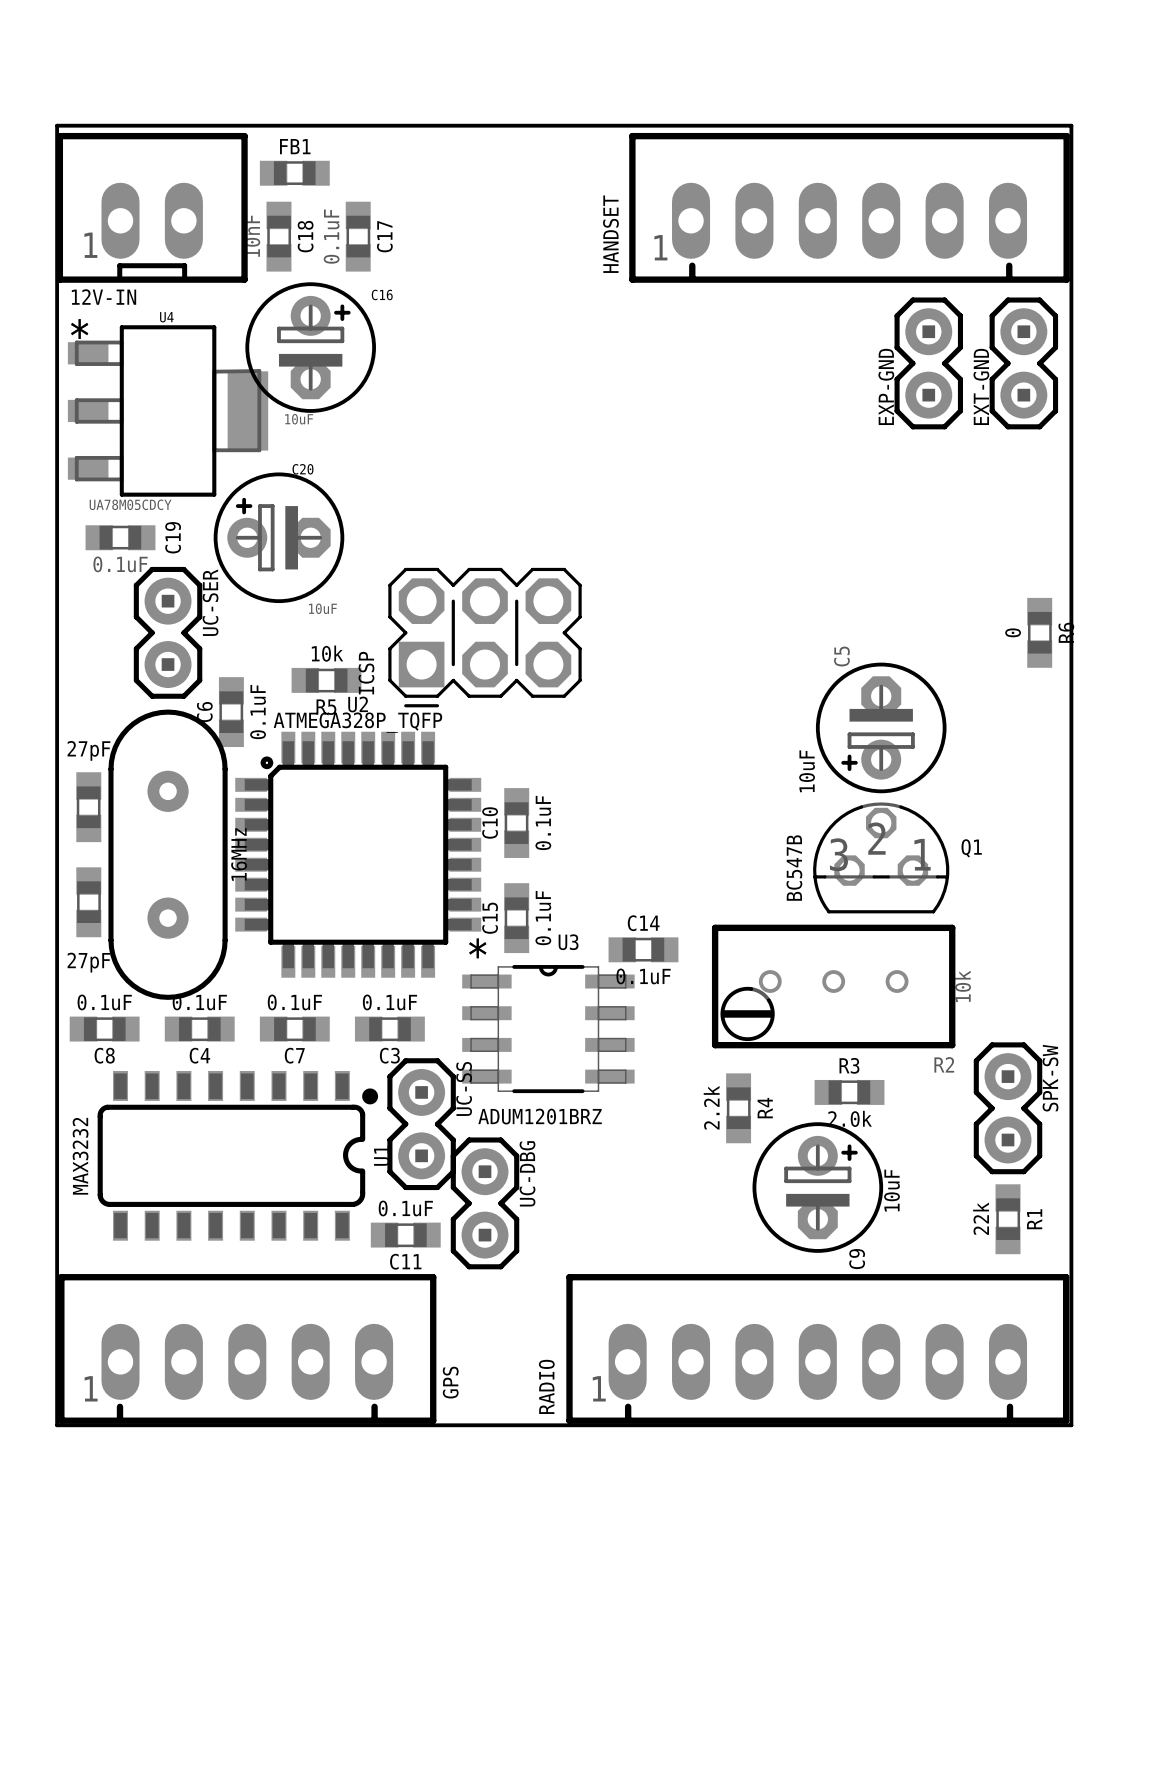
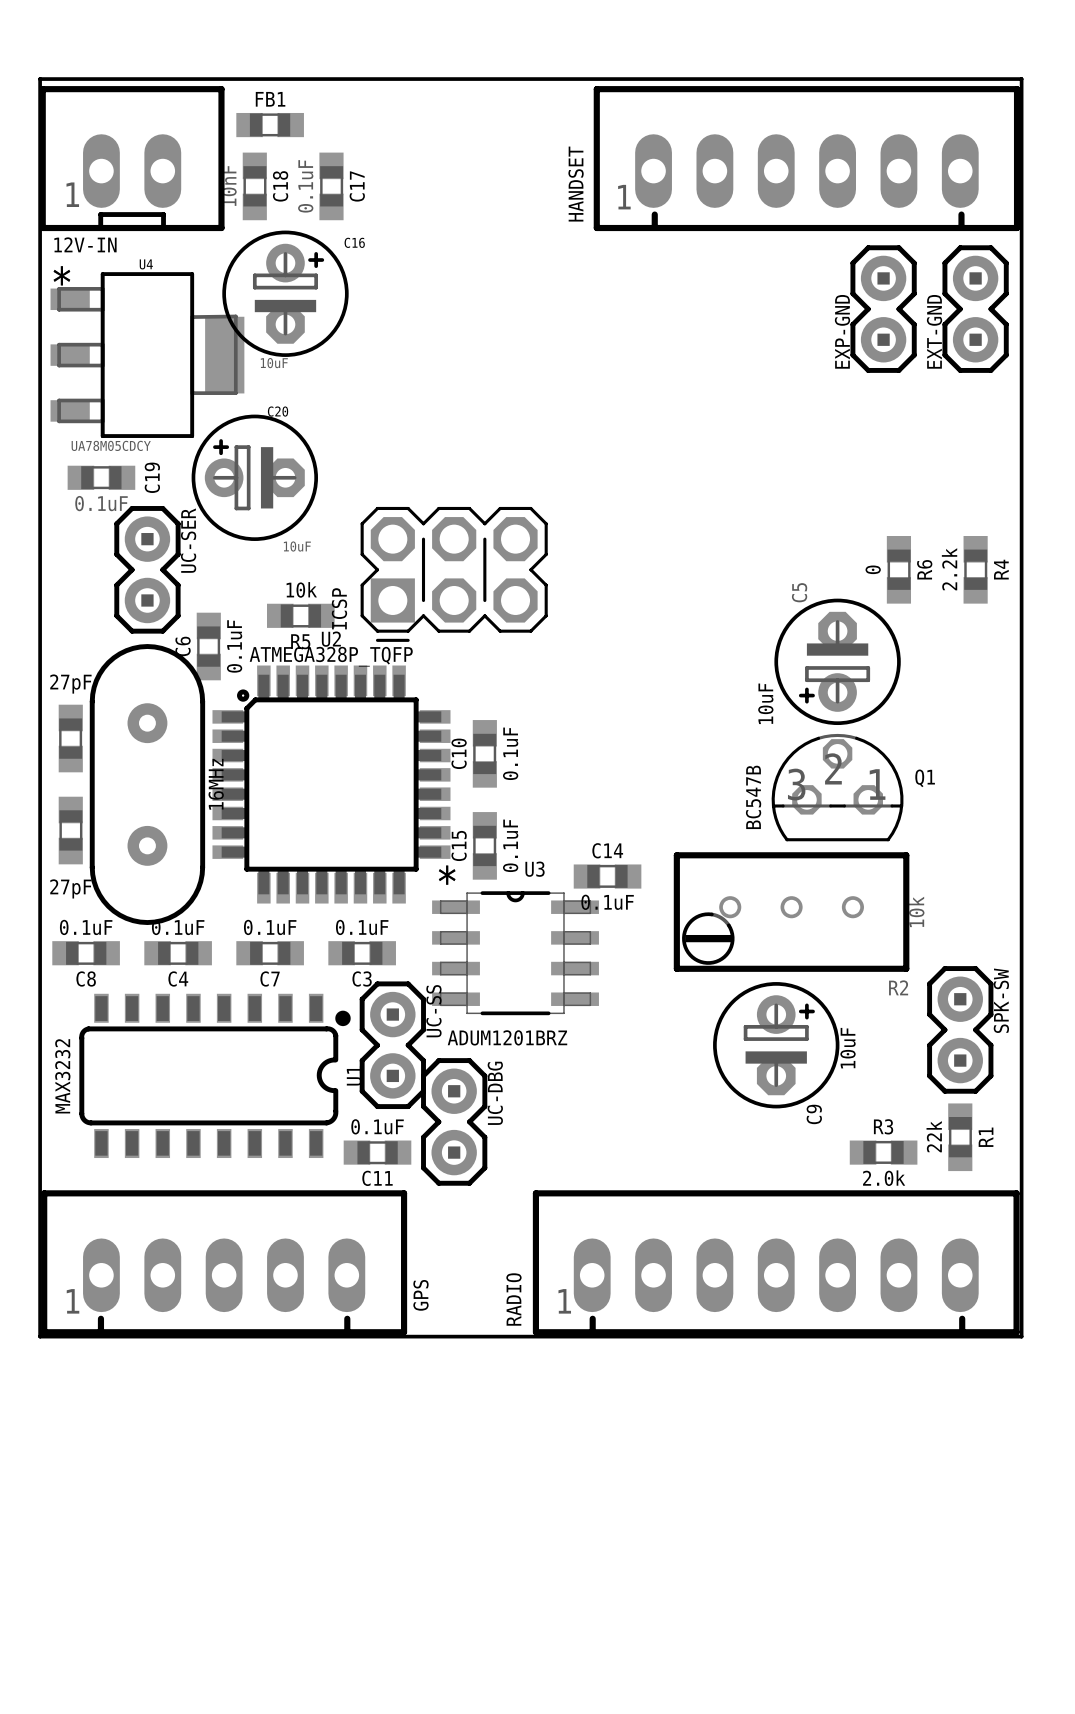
R6 position: (1039, 632) -> (898, 569)
R3 position: (849, 1092) -> (883, 1152)
R4 position: (738, 1108) -> (975, 569)
C9 position: (817, 1187) -> (776, 1045)

